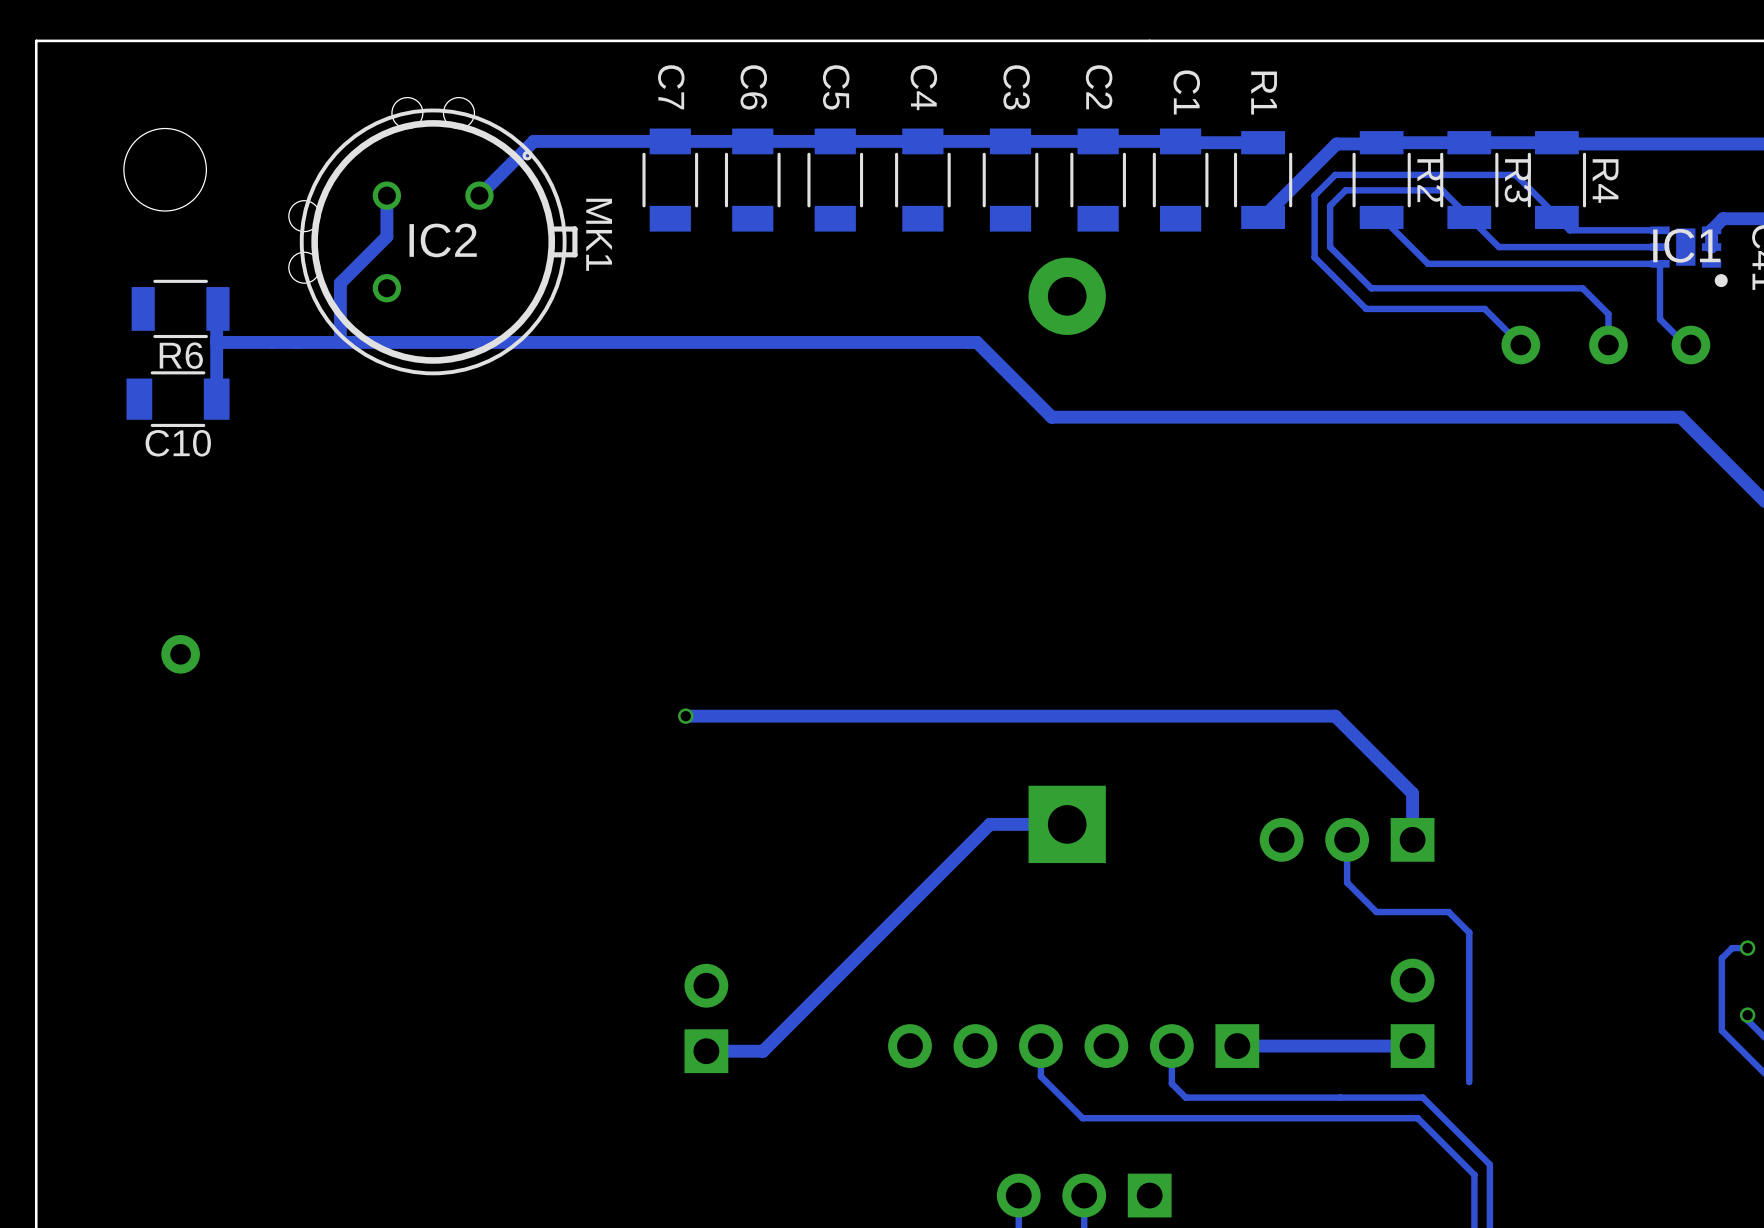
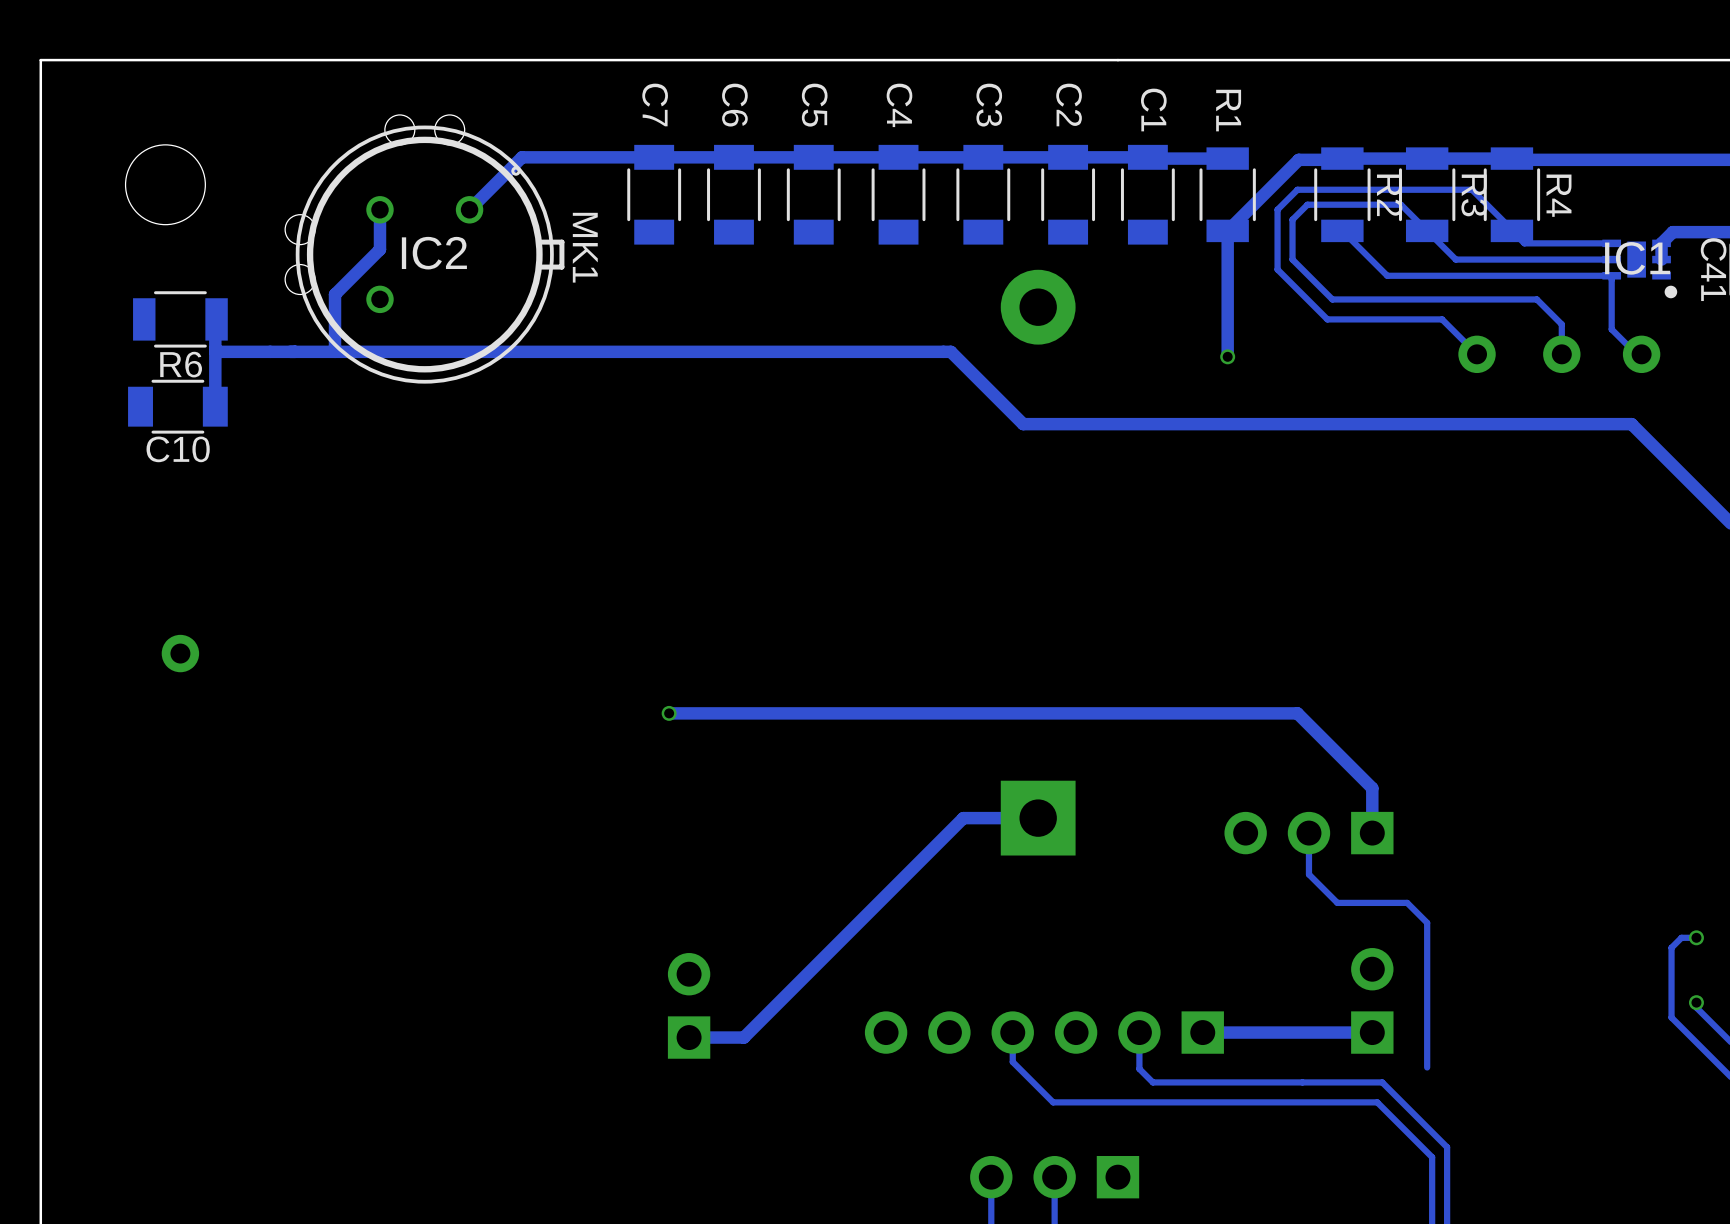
track: none -> (1227, 230) (1227, 356)
via: none -> (1227, 356)

